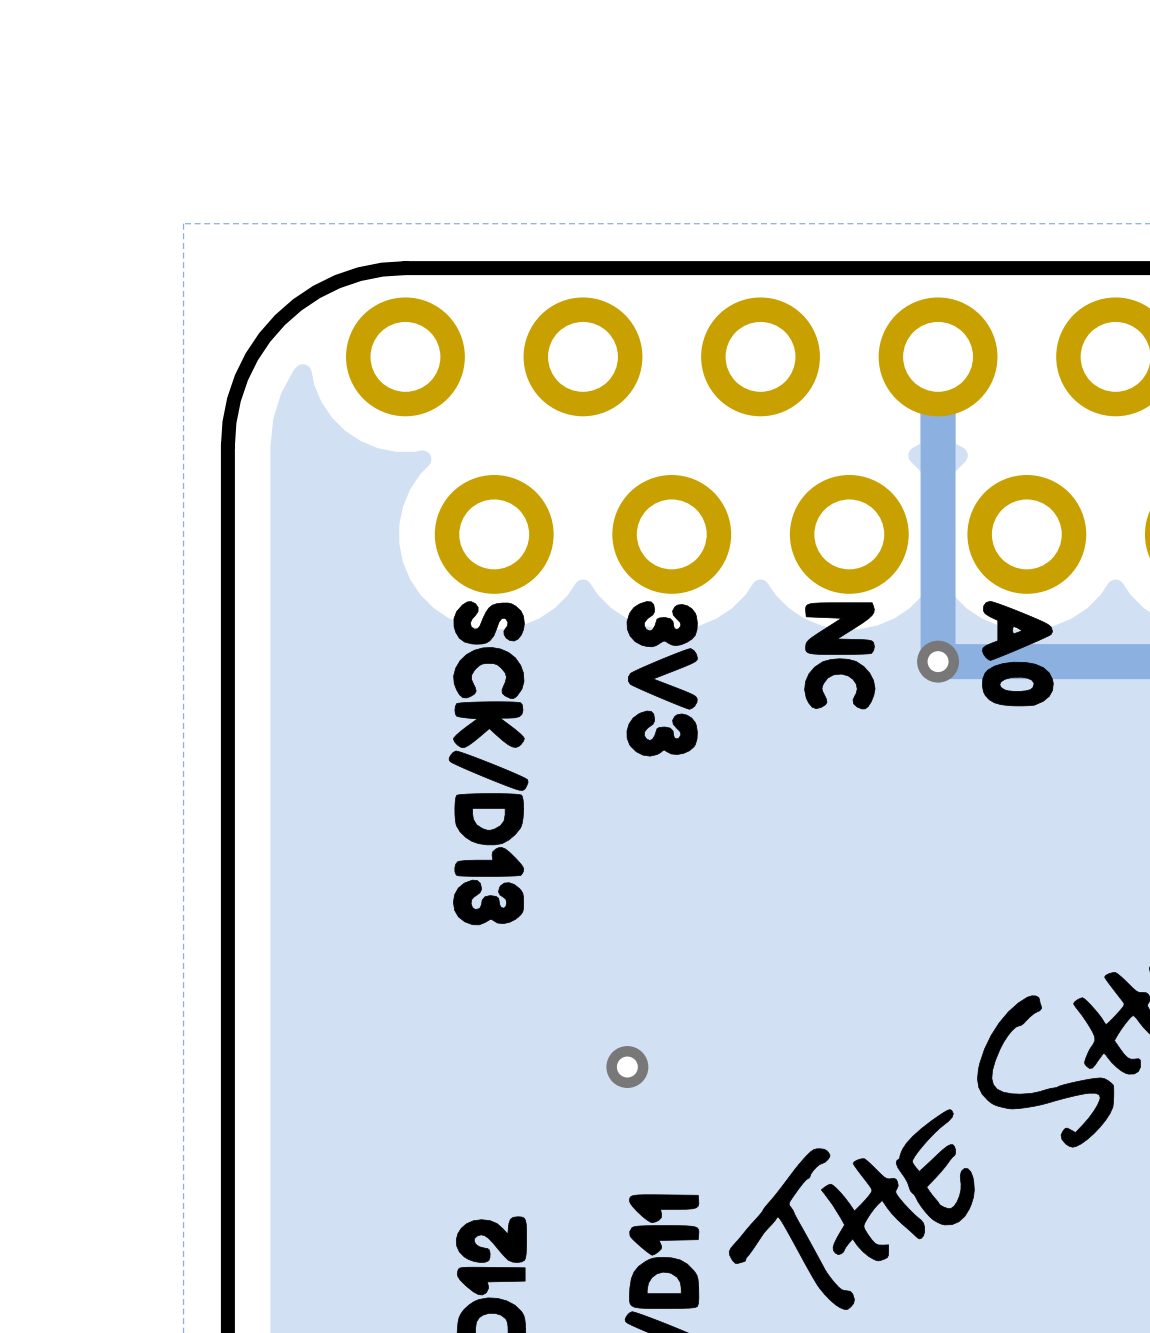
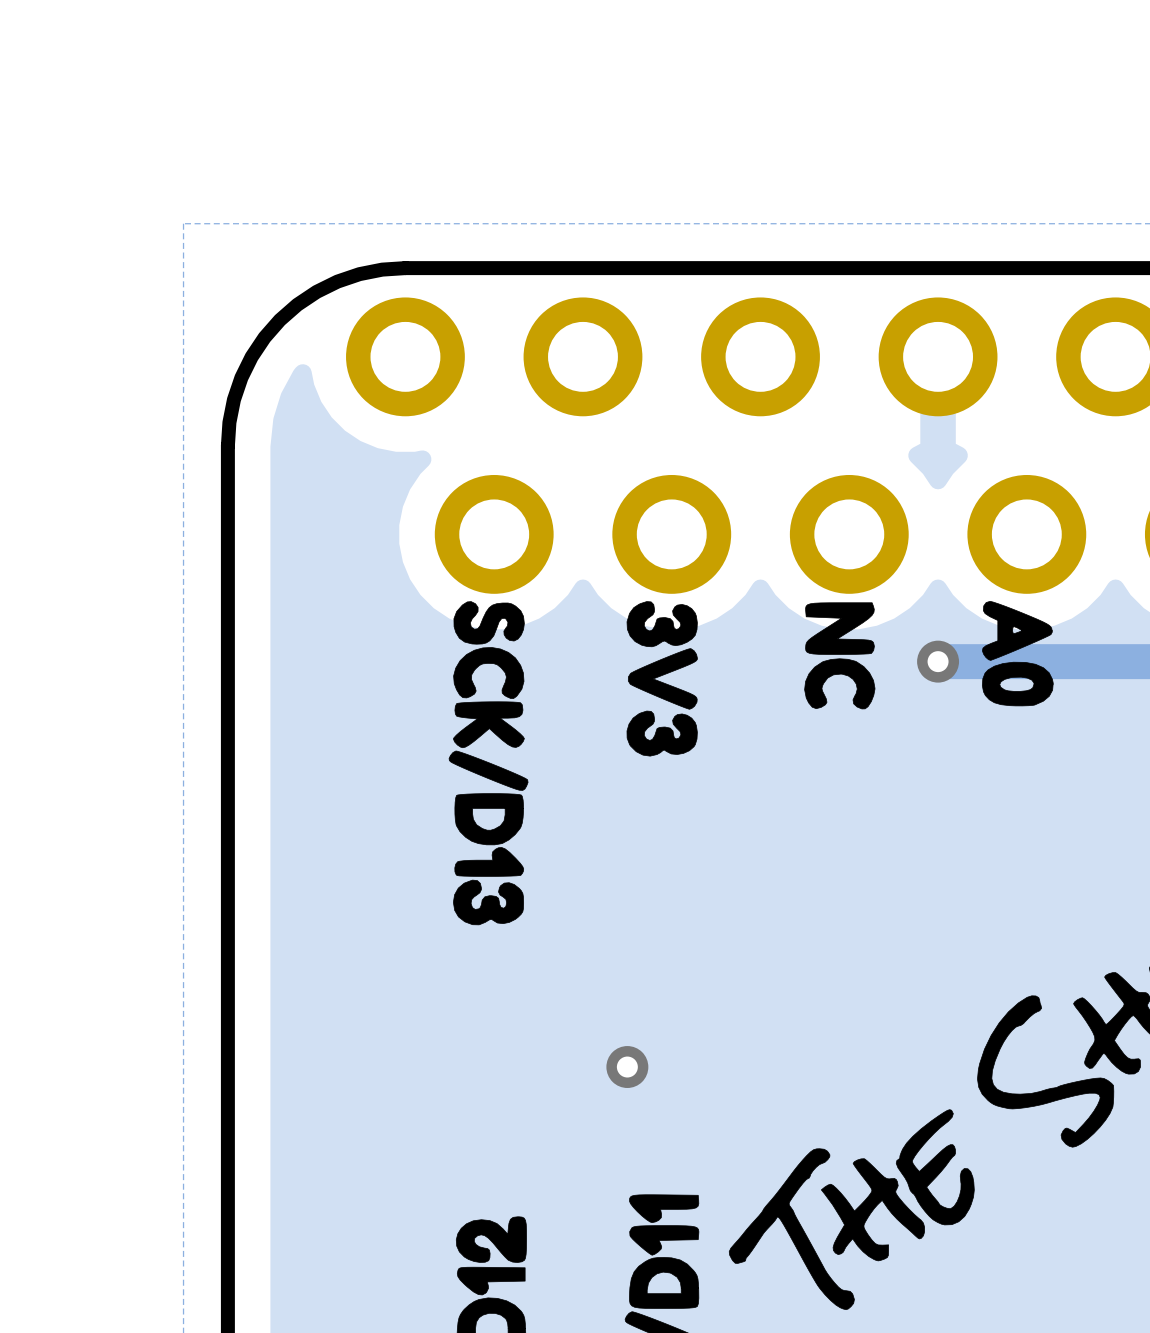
track: (938, 356) (938, 661) -> none

